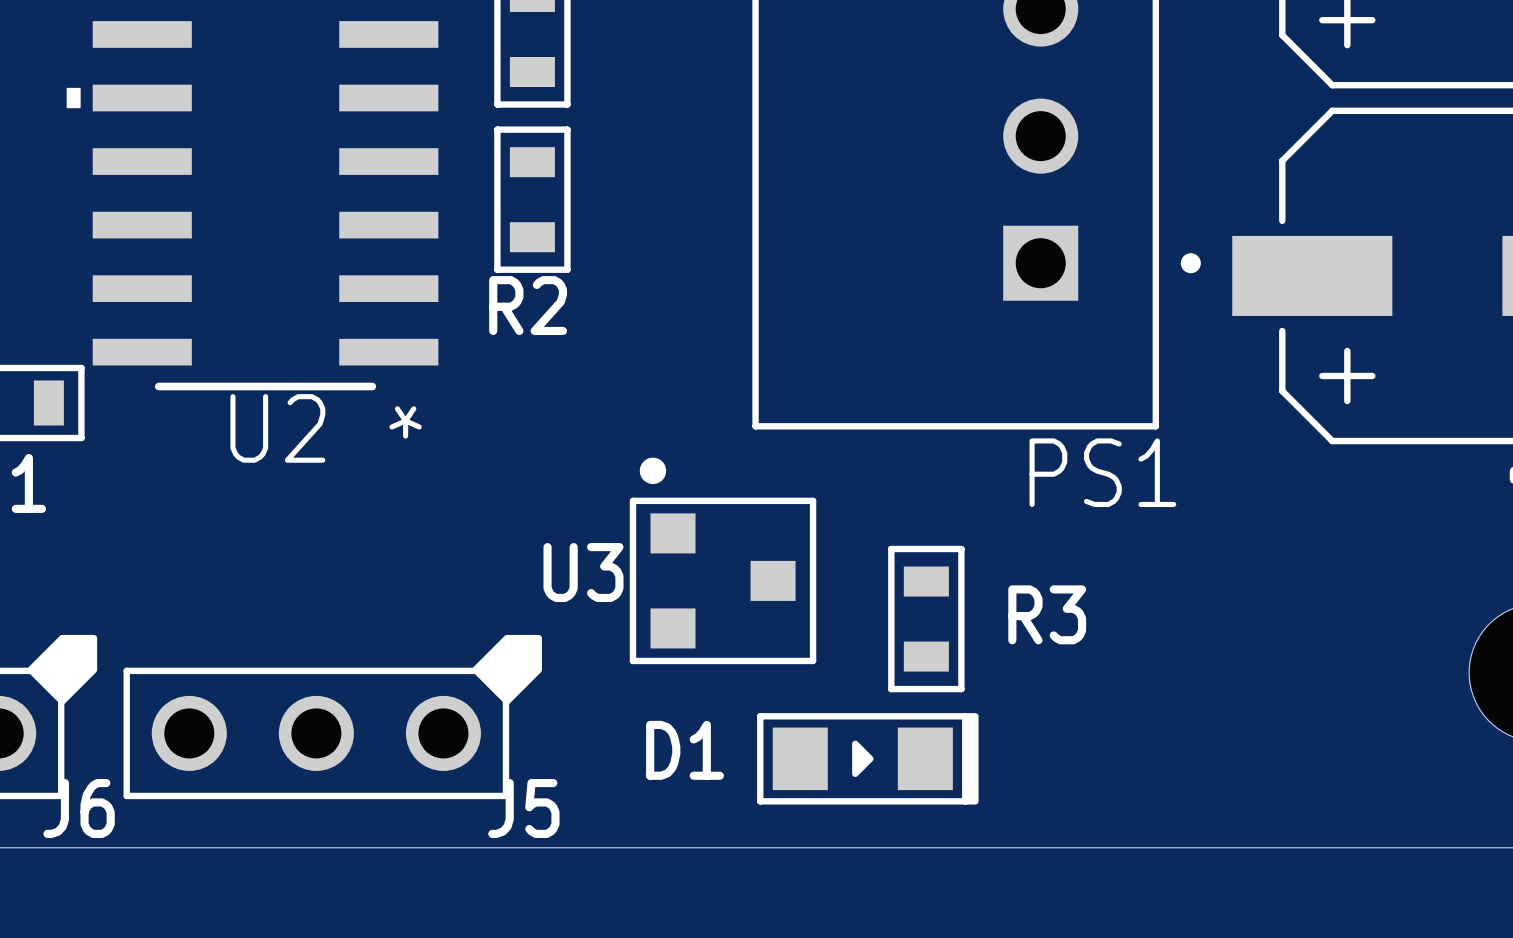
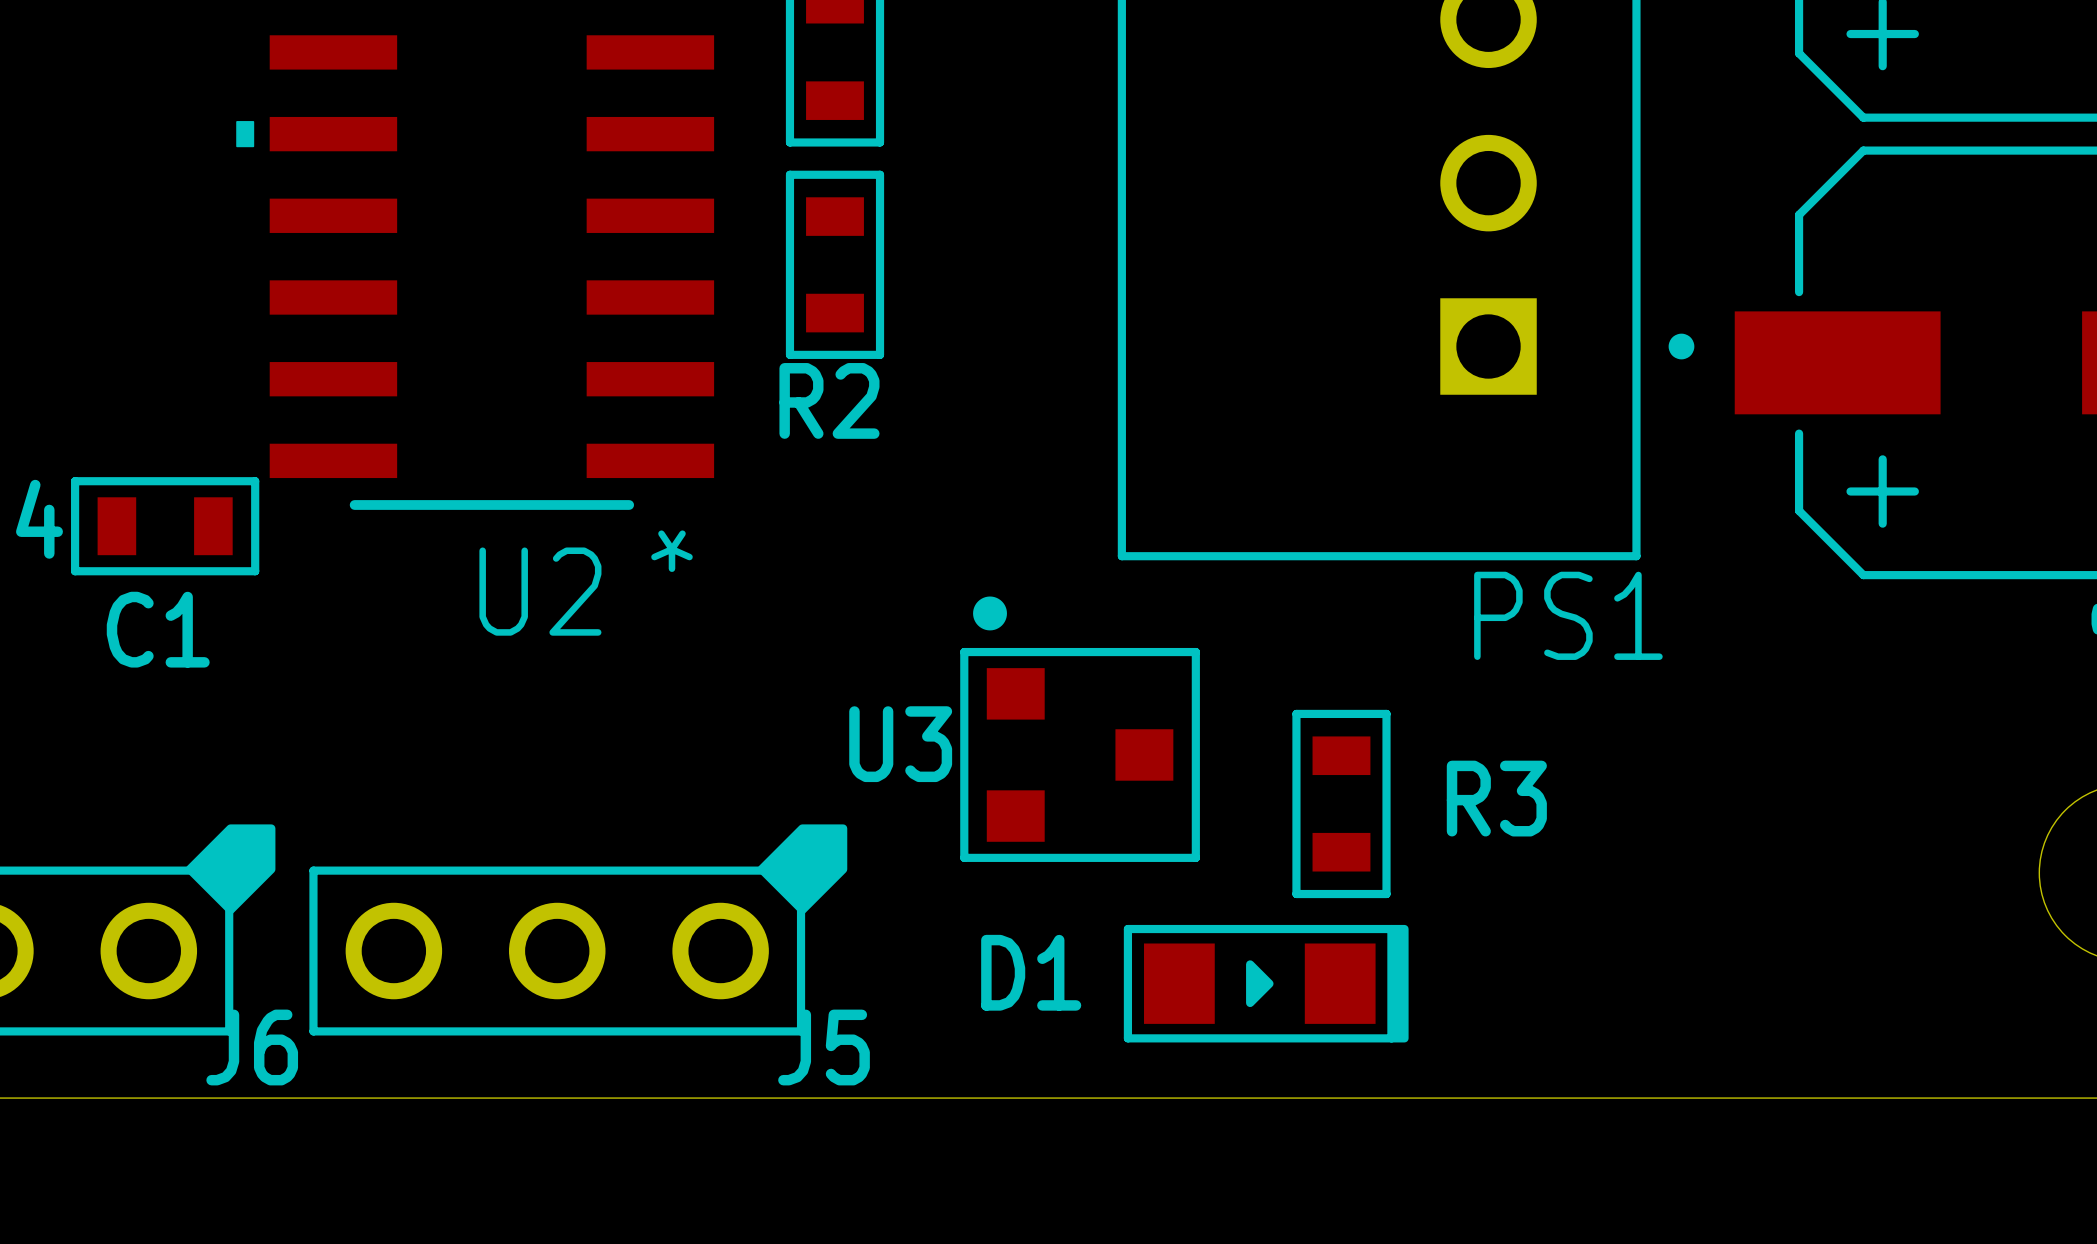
U2 name position: U2 (277, 428) -> U2 (540, 591)

